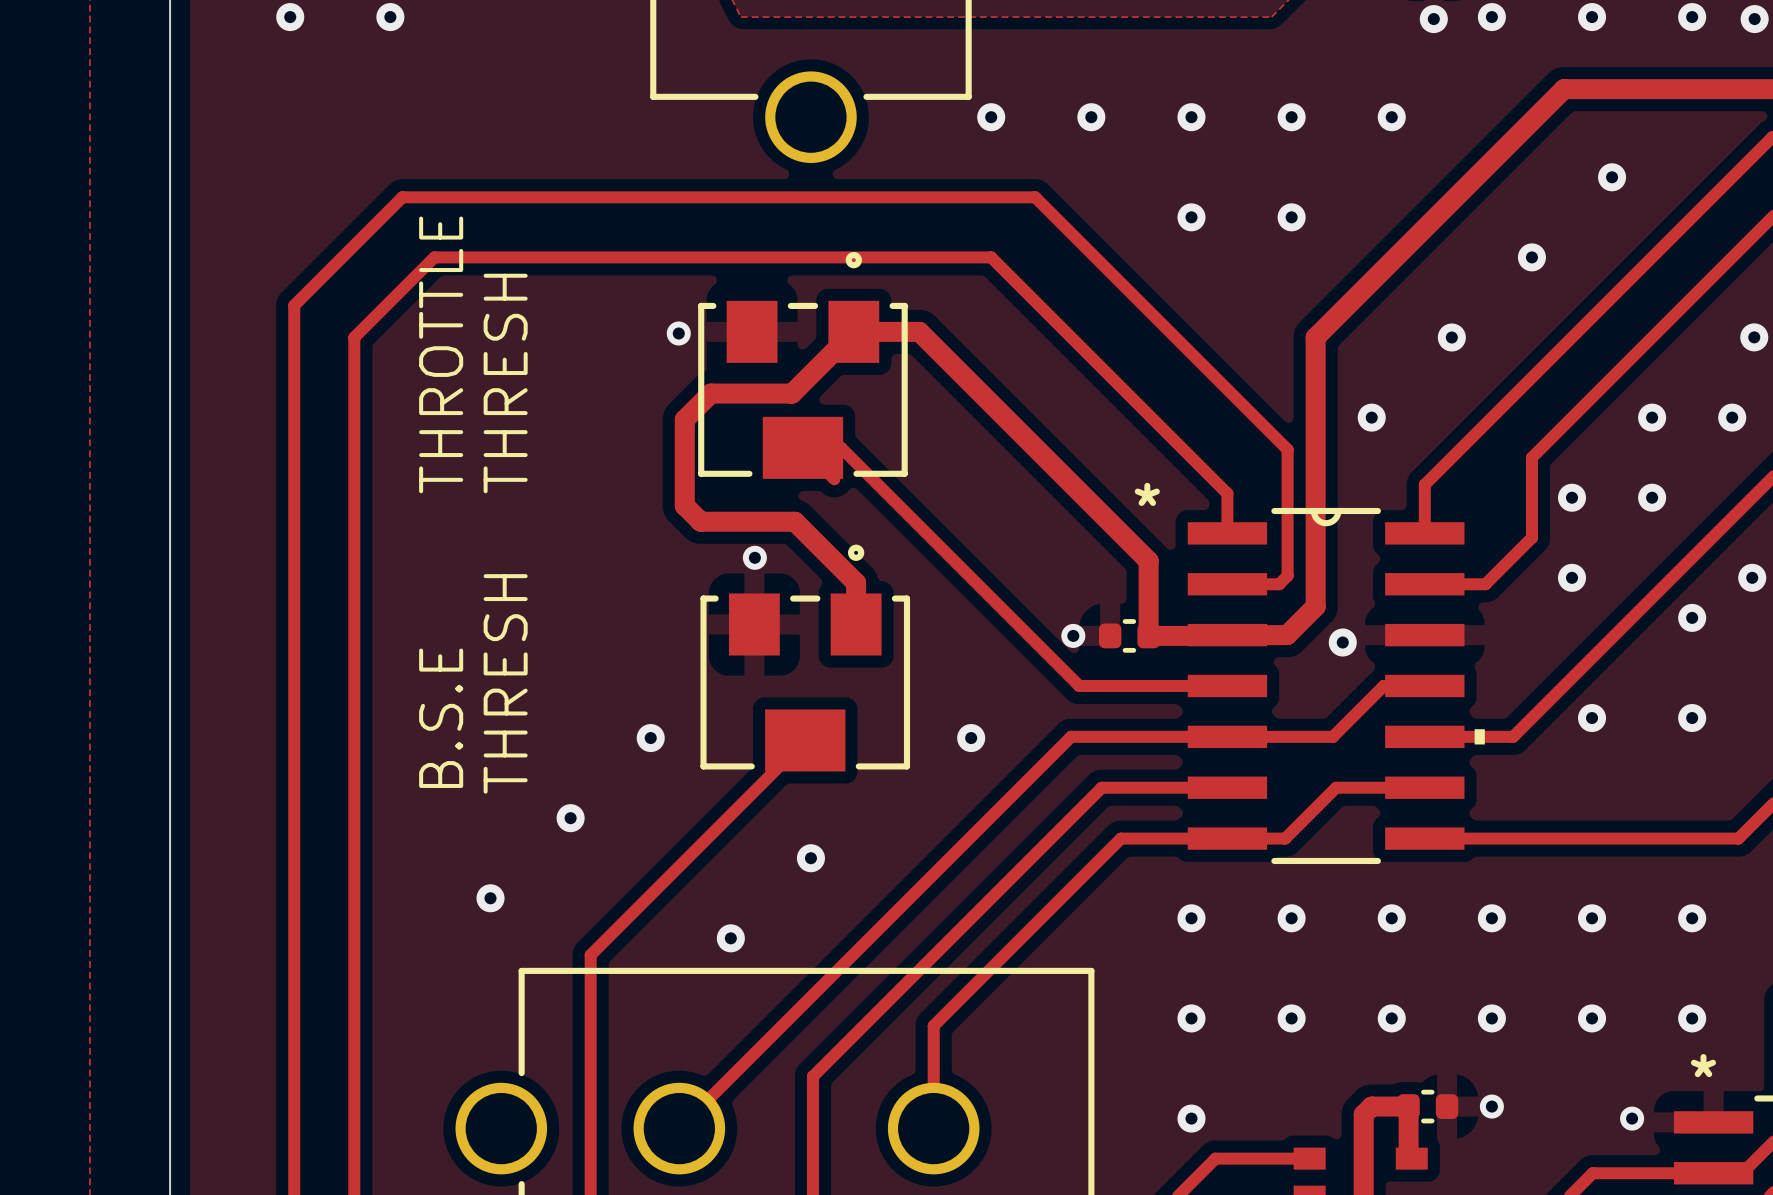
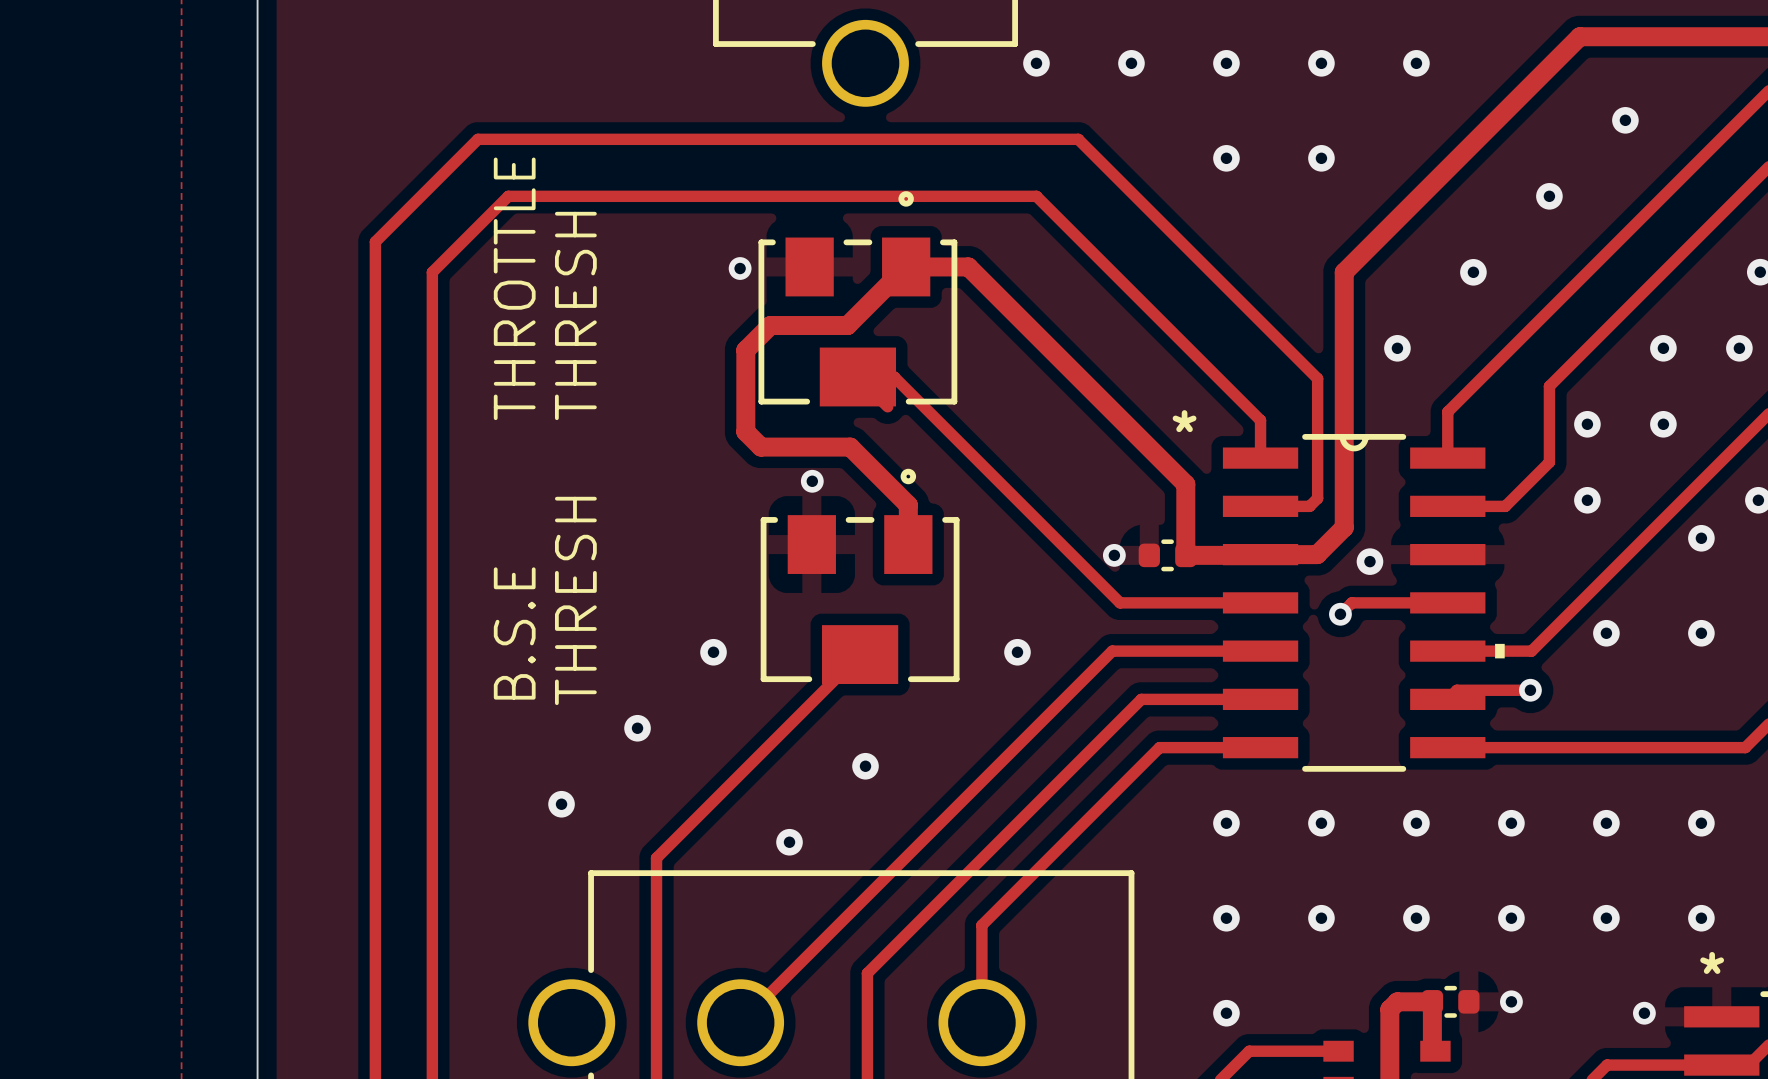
track: (1383, 685) (1332, 736) (1227, 736) -> (1408, 602) (1351, 602) (1340, 614)
via: none -> (1340, 614)
via: none -> (1530, 690)
track: (1424, 787) (1336, 787) (1285, 838) (1227, 838) -> (1447, 699) (1456, 690) (1530, 690)

